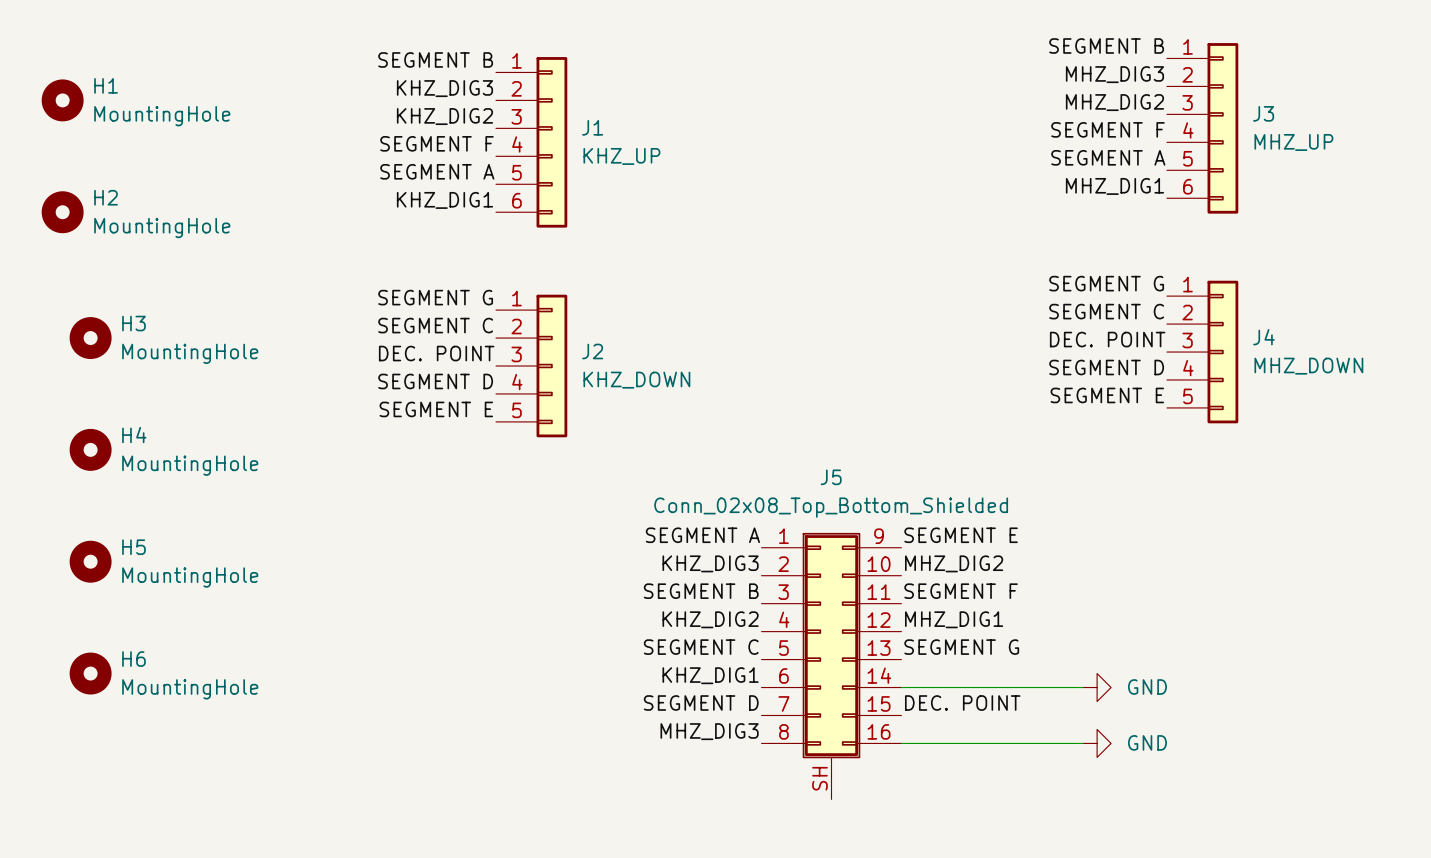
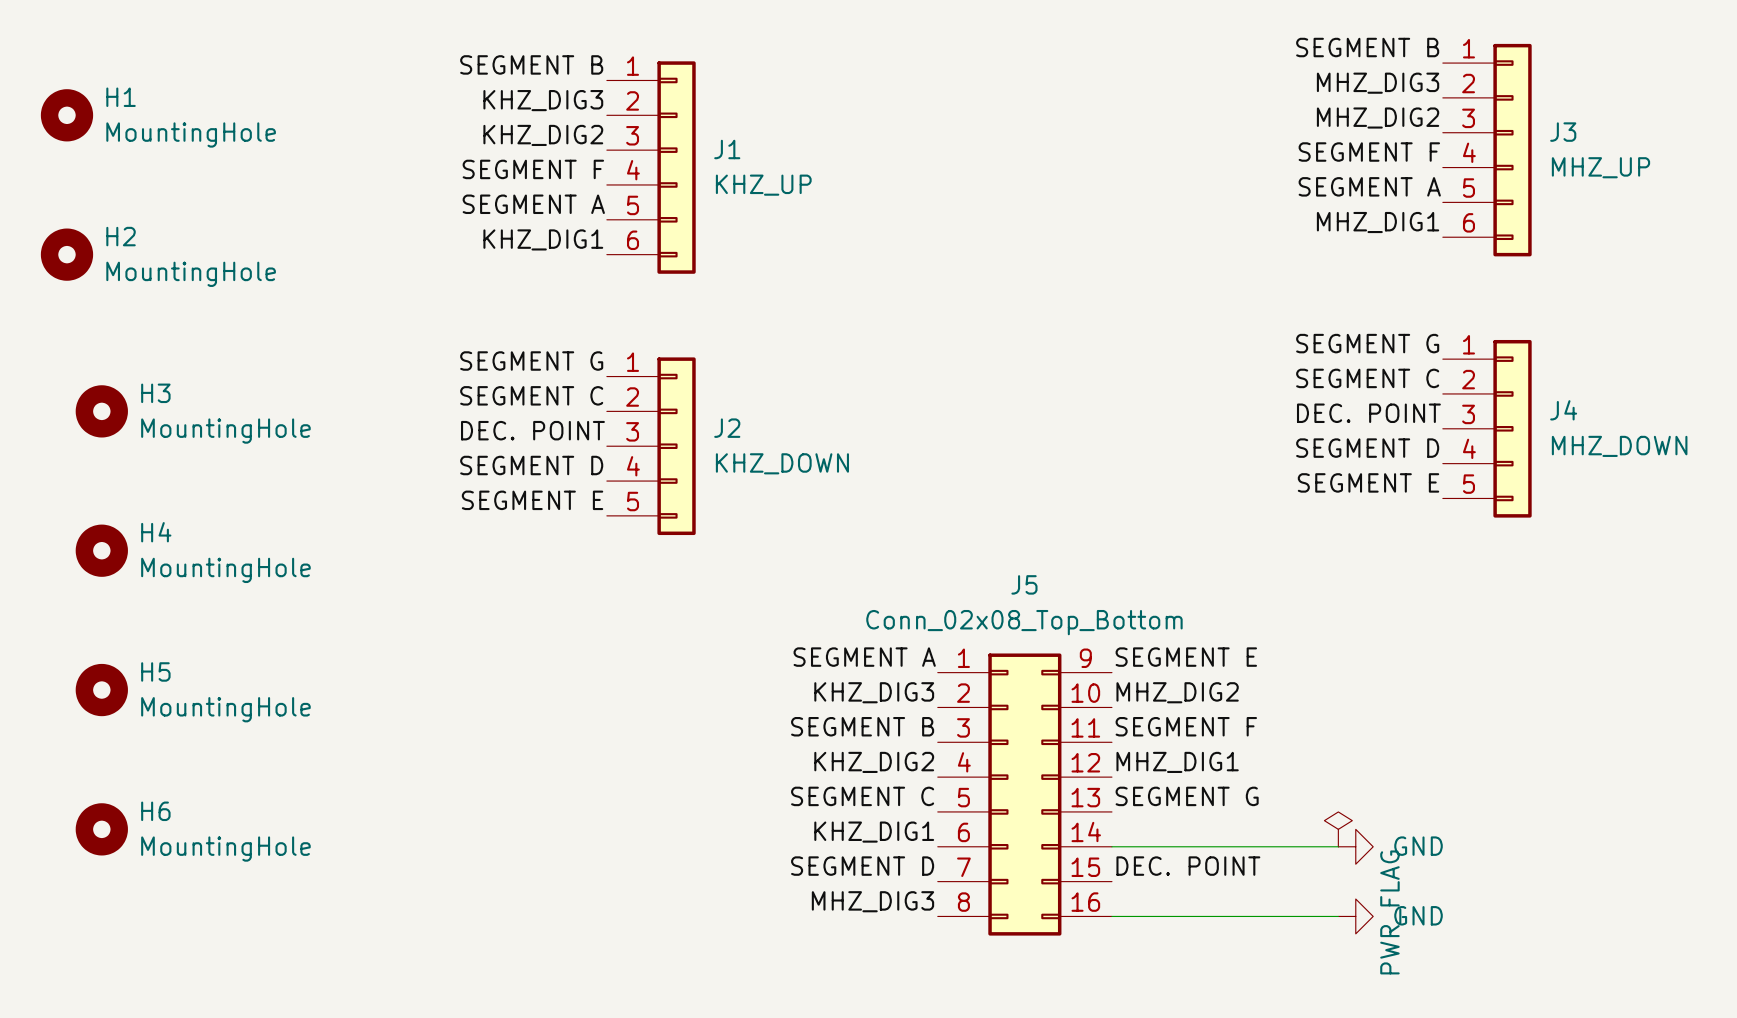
J5 value: Conn_02x08_Top_Bottom_Shielded (831, 507) -> Conn_02x08_Top_Bottom (1024, 622)
J5 symbol: [761, 532, 902, 800] -> [937, 653, 1112, 936]
power symbol: none -> PWR_FLAG (1338, 829)

